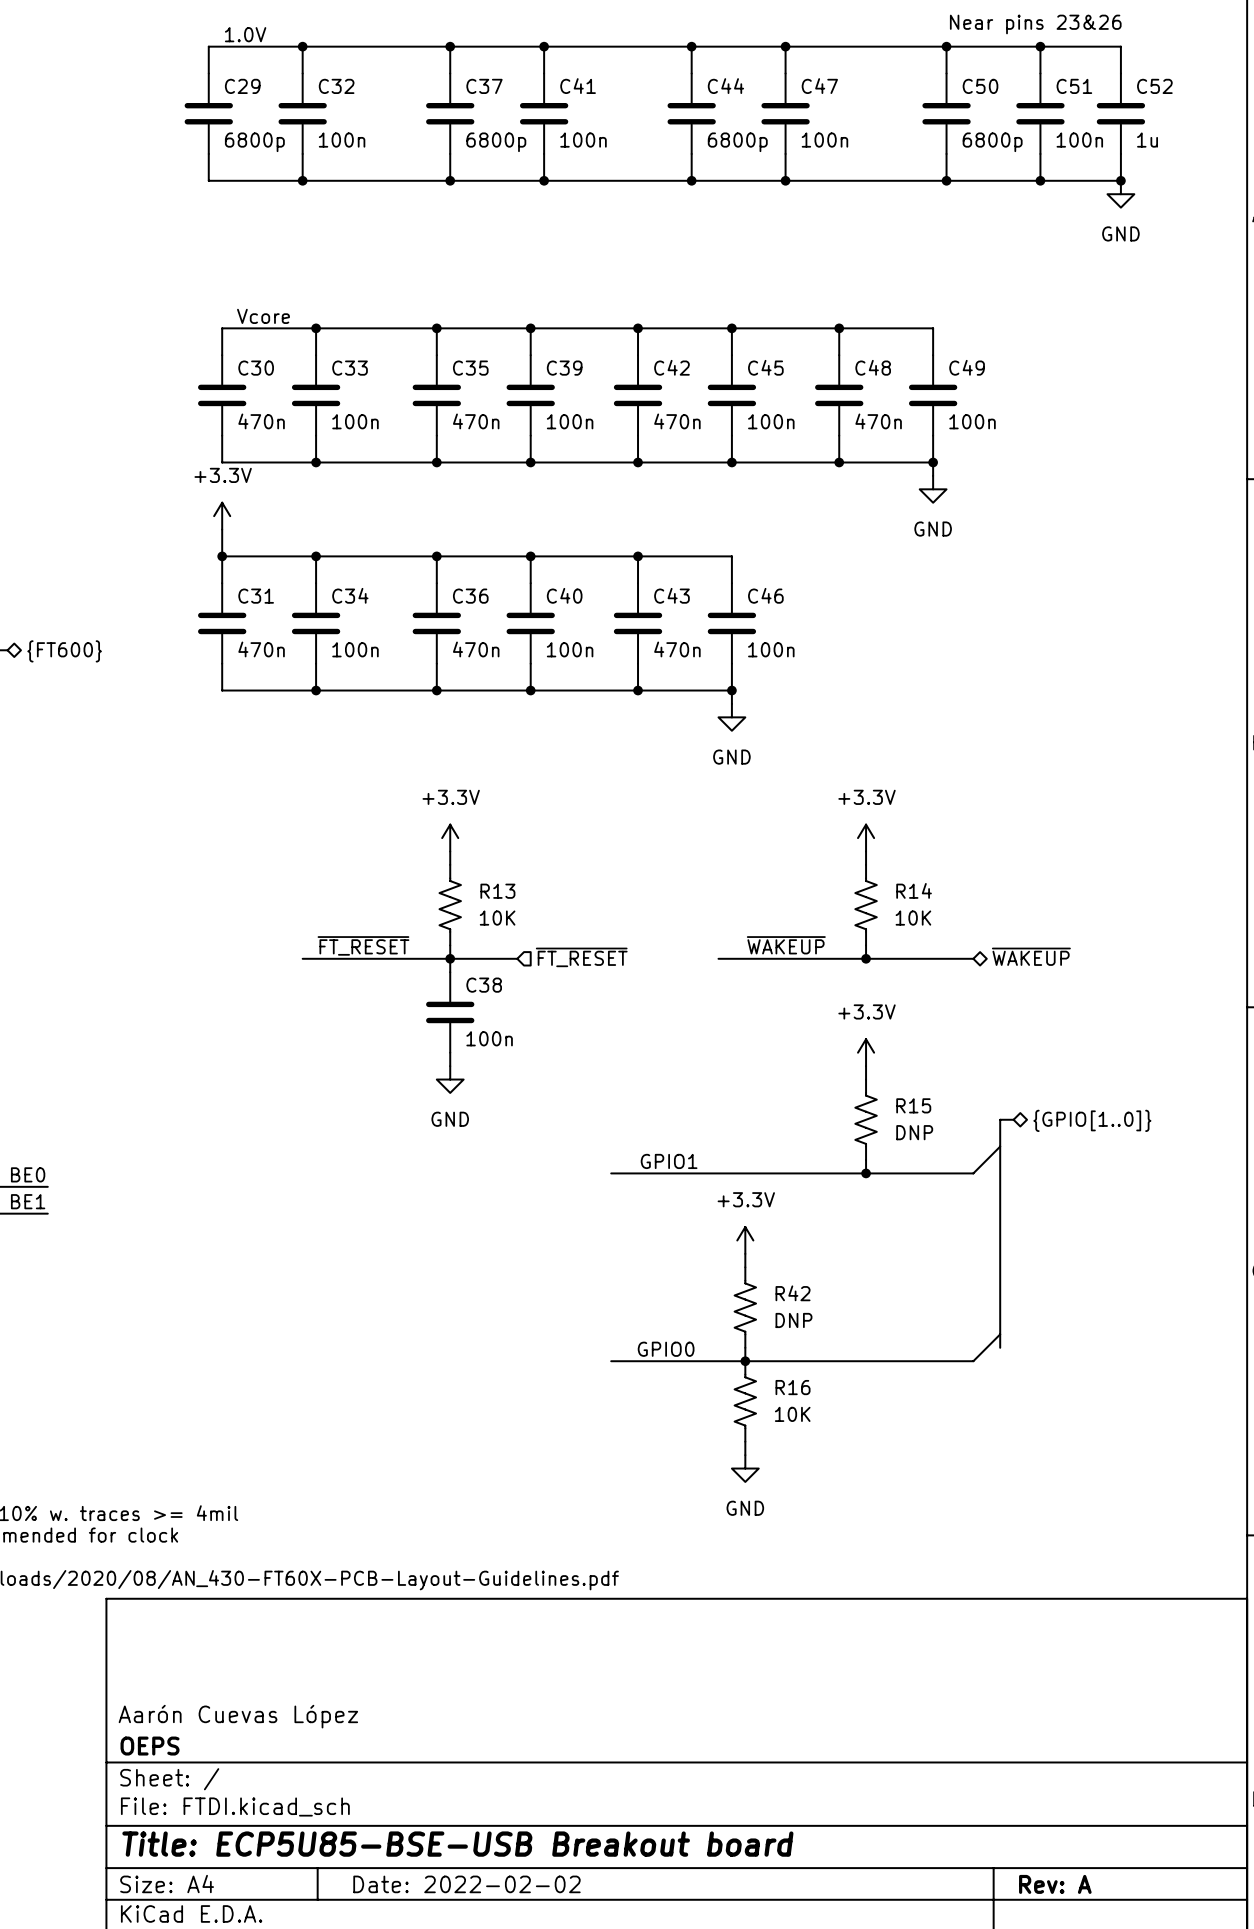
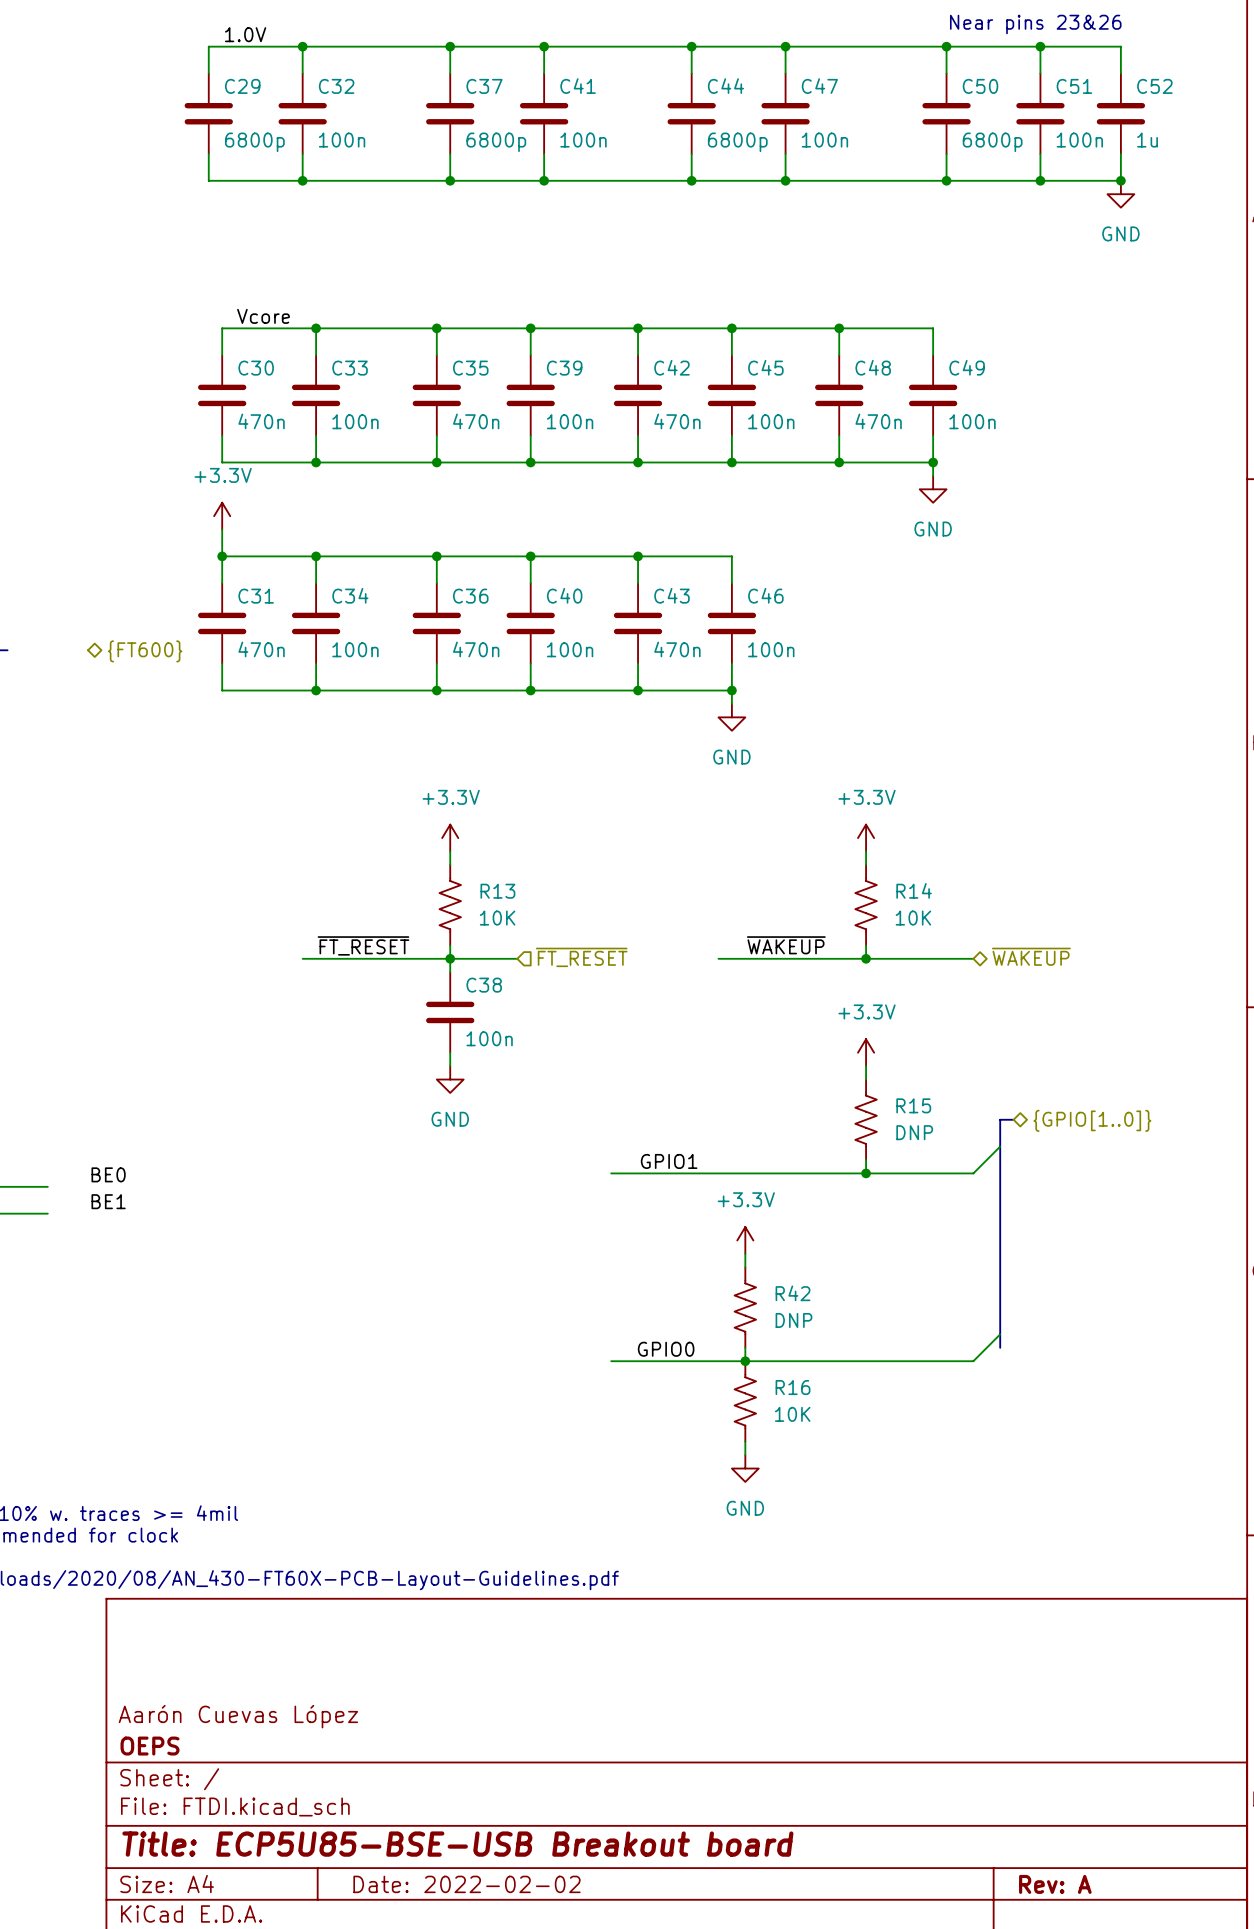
hierarchical label position: {FT600} (64, 651) -> {FT600} (145, 651)
label position: BE0 (28, 1174) -> BE0 (108, 1174)
label position: BE1 (28, 1201) -> BE1 (108, 1201)

